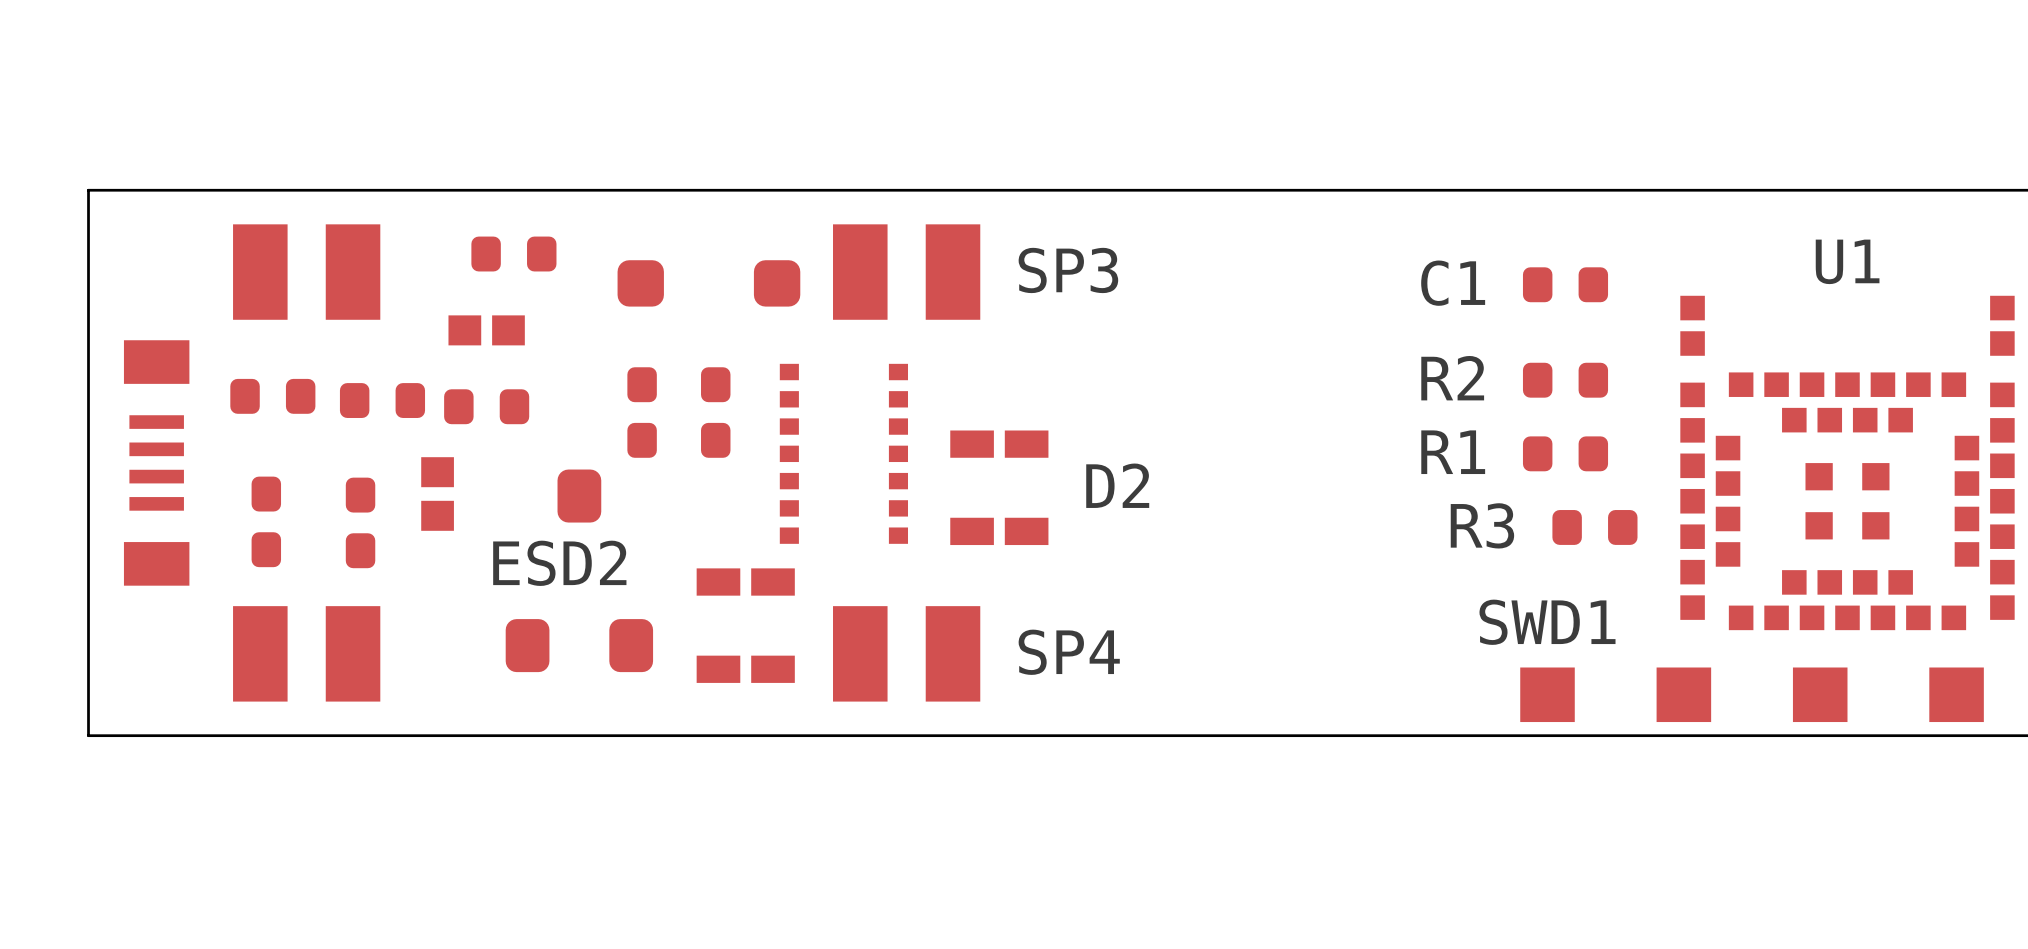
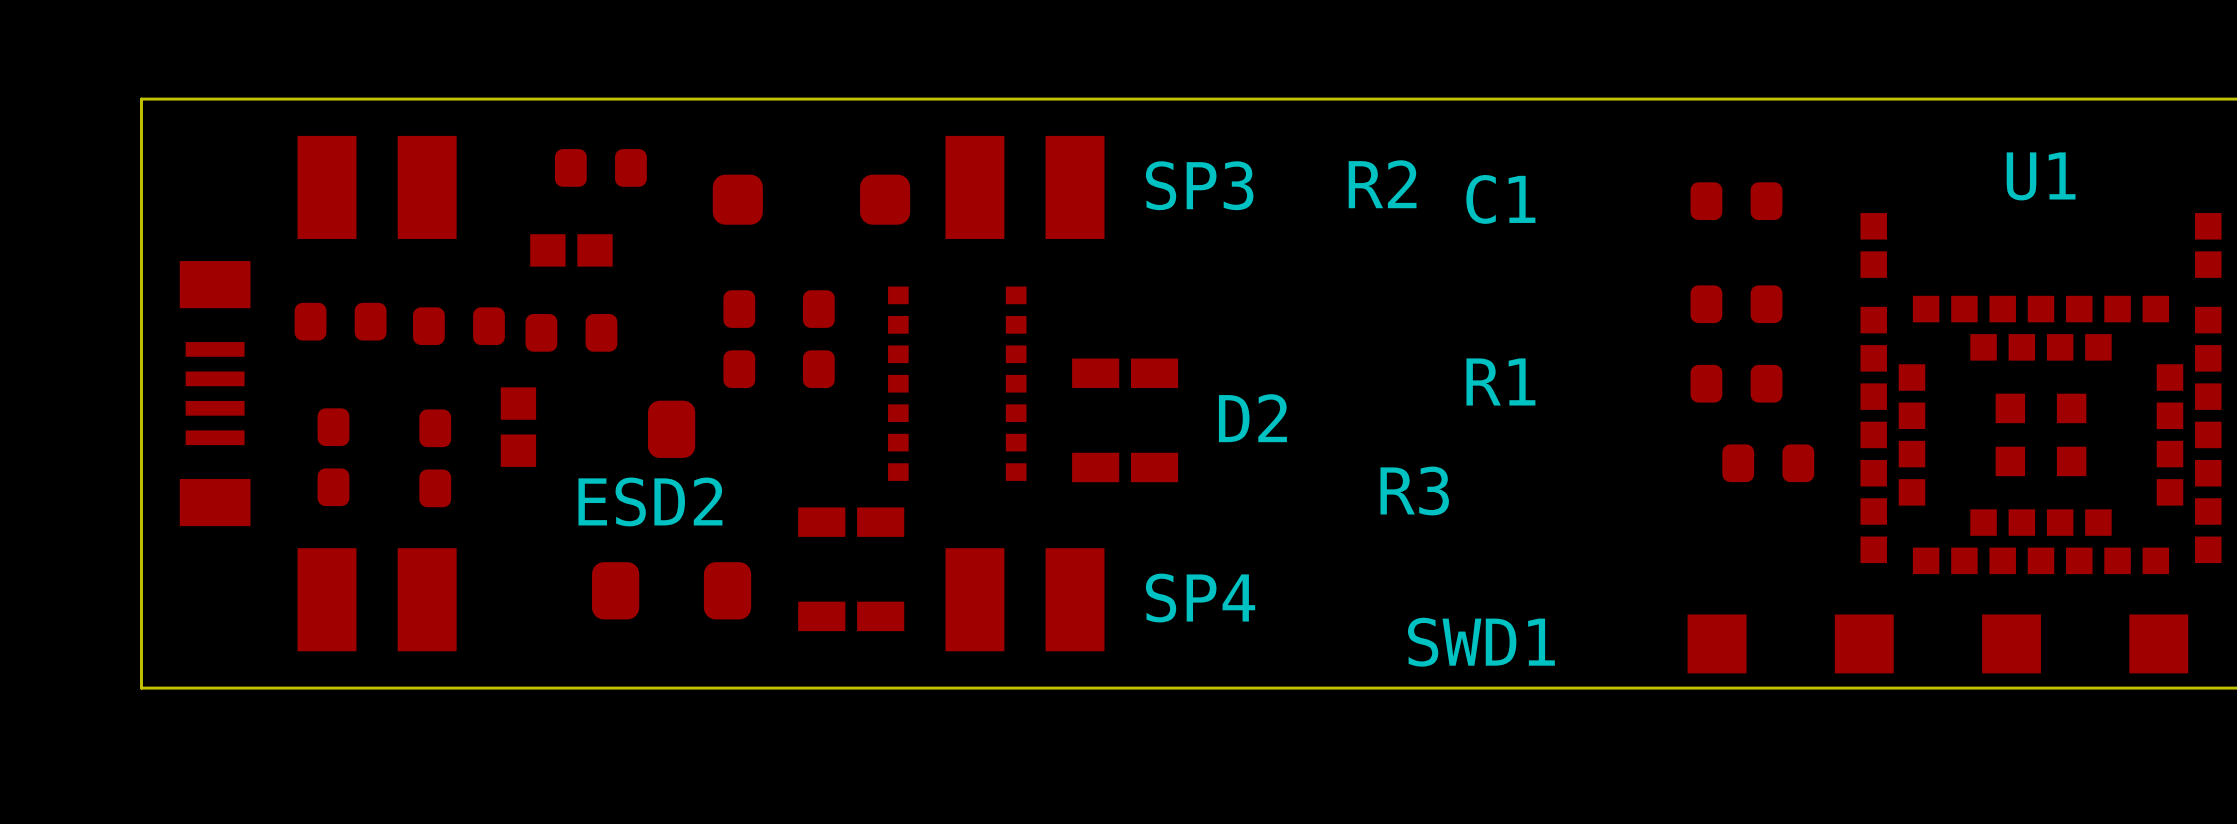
C1 name position: C1 (1453, 283) -> C1 (1500, 199)
R2 name position: R2 (1452, 378) -> R2 (1382, 184)
R1 name position: R1 (1453, 452) -> R1 (1500, 381)
R3 name position: R3 (1482, 525) -> R3 (1414, 490)
SWD1 name position: SWD1 (1547, 622) -> SWD1 (1481, 642)

